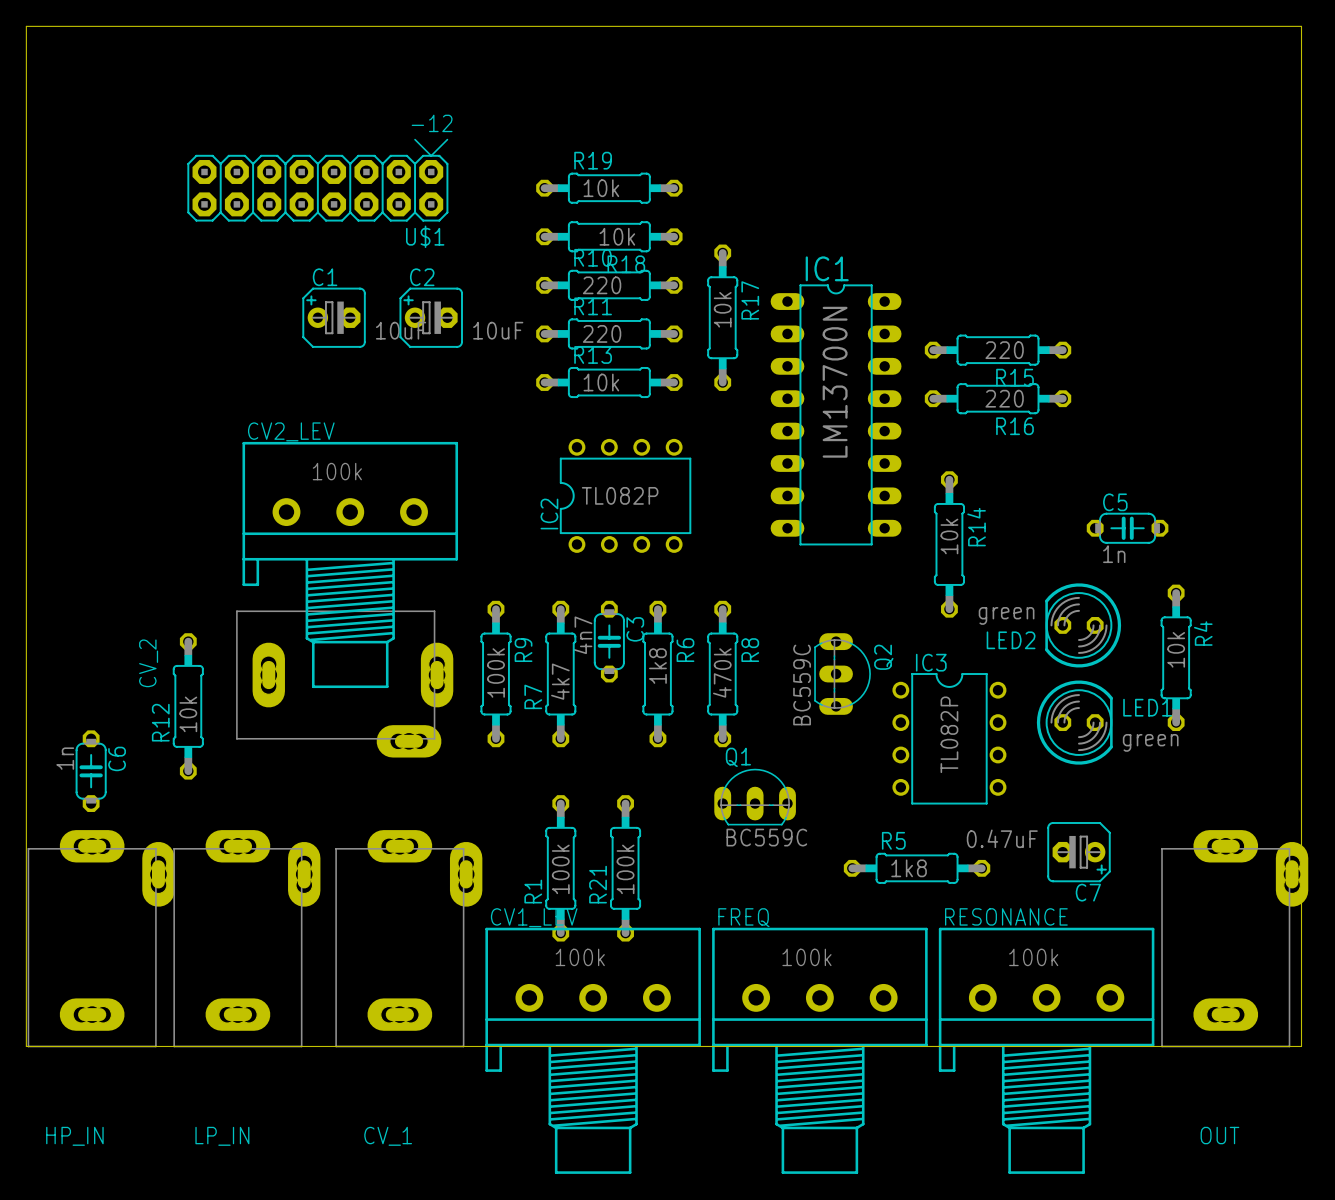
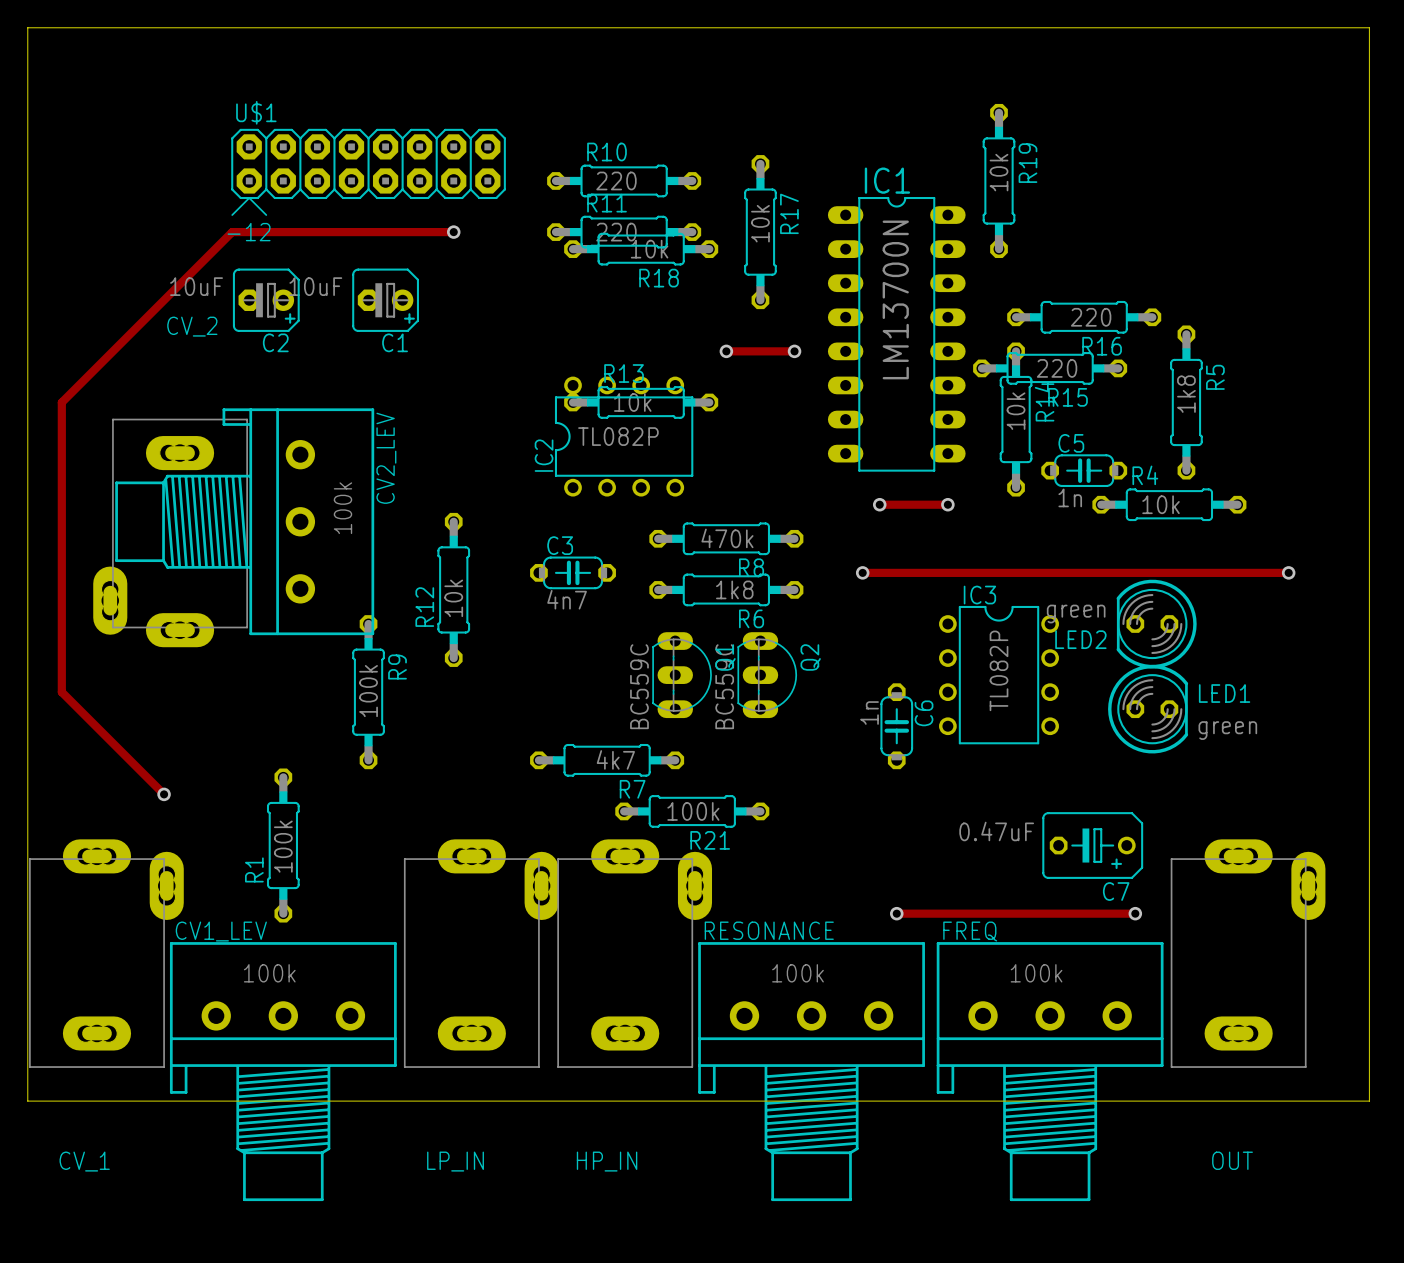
U$1 footprint: [187, 138, 449, 222] -> [231, 128, 506, 216]
R19 rotation: 0° (609, 188) -> 90° clockwise (999, 180)
R19 position: (609, 188) -> (999, 180)
track: none -> (453, 232) (232, 232) (61, 402) (61, 692) (164, 794)
via: none -> (453, 232)
U$1 name position: U$1 (425, 236) -> U$1 (256, 112)
R10 position: (609, 285) -> (624, 180)
C1 rotation: 0° (334, 317) -> 180° (385, 300)
C1 position: (334, 317) -> (385, 300)
C2 rotation: 0° (431, 317) -> 180° (266, 300)
C2 position: (431, 317) -> (266, 300)
R17 position: (722, 317) -> (760, 232)
R11 position: (609, 333) -> (624, 232)
track: none -> (726, 351) (794, 351)
via: none -> (726, 351)
via: none -> (794, 351)
R16 position: (998, 398) -> (1084, 317)
IC1 position: (836, 414) -> (896, 334)
track: none -> (879, 504) (947, 504)
via: none -> (879, 504)
via: none -> (947, 504)
IC2 position: (625, 495) -> (624, 436)
C5 position: (1127, 528) -> (1084, 470)
track: none -> (862, 572) (1288, 572)
via: none -> (862, 572)
R14 position: (949, 544) -> (1016, 419)
via: none -> (1288, 572)
CV2_LEV rotation: 0° (350, 564) -> 90° clockwise (244, 521)
LED2 position: (1083, 625) -> (1156, 624)
R4 name position: R4 (1203, 633) -> R4 (1145, 475)
C3 rotation: 0° (609, 641) -> 90° counterclockwise (573, 572)
C3 position: (609, 641) -> (573, 572)
R4 rotation: 0° (1176, 657) -> 90° clockwise (1169, 504)
R4 position: (1176, 657) -> (1169, 504)
R9 position: (496, 674) -> (368, 692)
R7 rotation: 0° (560, 674) -> 90° clockwise (607, 760)
R6 rotation: 0° (657, 674) -> 90° clockwise (726, 589)
R6 position: (657, 674) -> (726, 589)
R8 rotation: 0° (722, 674) -> 90° clockwise (726, 538)
R8 position: (722, 674) -> (726, 538)
Q2 position: (842, 674) -> (767, 675)
CV_2 rotation: 0° (344, 684) -> 90° clockwise (170, 532)
CV_2 position: (344, 684) -> (170, 532)
R7 name position: R7 (533, 696) -> R7 (632, 789)
R12 position: (188, 706) -> (453, 589)
LED1 position: (1074, 722) -> (1148, 709)
IC3 position: (949, 738) -> (999, 675)
via: none -> (164, 794)
C6 position: (91, 771) -> (896, 726)
Q1 rotation: 0° (755, 797) -> 90° clockwise (682, 675)
Q1 position: (755, 797) -> (682, 675)
C7 footprint: [1047, 822, 1111, 883] -> [1042, 812, 1144, 879]
R1 position: (560, 868) -> (283, 845)
R21 rotation: 0° (625, 868) -> 90° clockwise (692, 811)
R21 position: (625, 868) -> (692, 811)
track: none -> (896, 913) (1135, 913)
via: none -> (896, 913)
R5 rotation: 0° (917, 868) -> 90° clockwise (1186, 402)
R5 position: (917, 868) -> (1186, 402)
via: none -> (1135, 913)
R21 name position: R21 (598, 884) -> R21 (710, 840)
HP_IN: none -> (634, 953)
HP_IN: (101, 938) -> none
LP_IN position: (246, 938) -> (481, 953)
CV_1 position: (408, 938) -> (106, 953)
OUT position: (1234, 938) -> (1248, 953)
CV1_LEV position: (593, 1050) -> (283, 1071)
FREQ position: (819, 1050) -> (1050, 1071)
RESONANCE position: (1046, 1050) -> (811, 1071)

